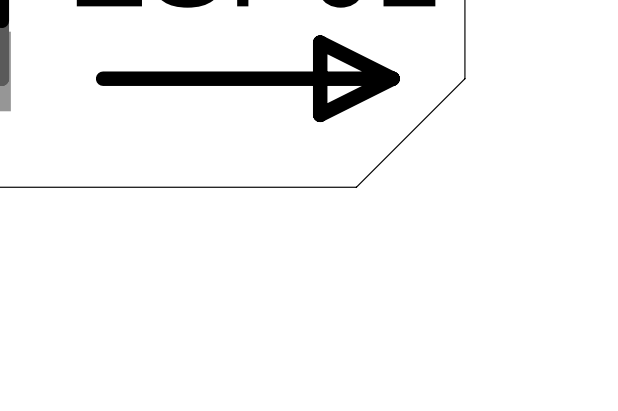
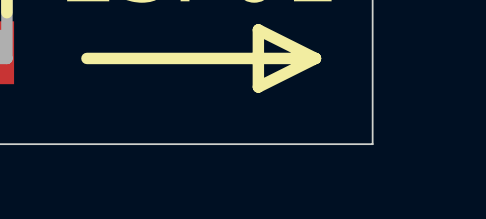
board edge: (464, 78) (356, 187) -> (372, 58) (372, 144) (286, 144)

